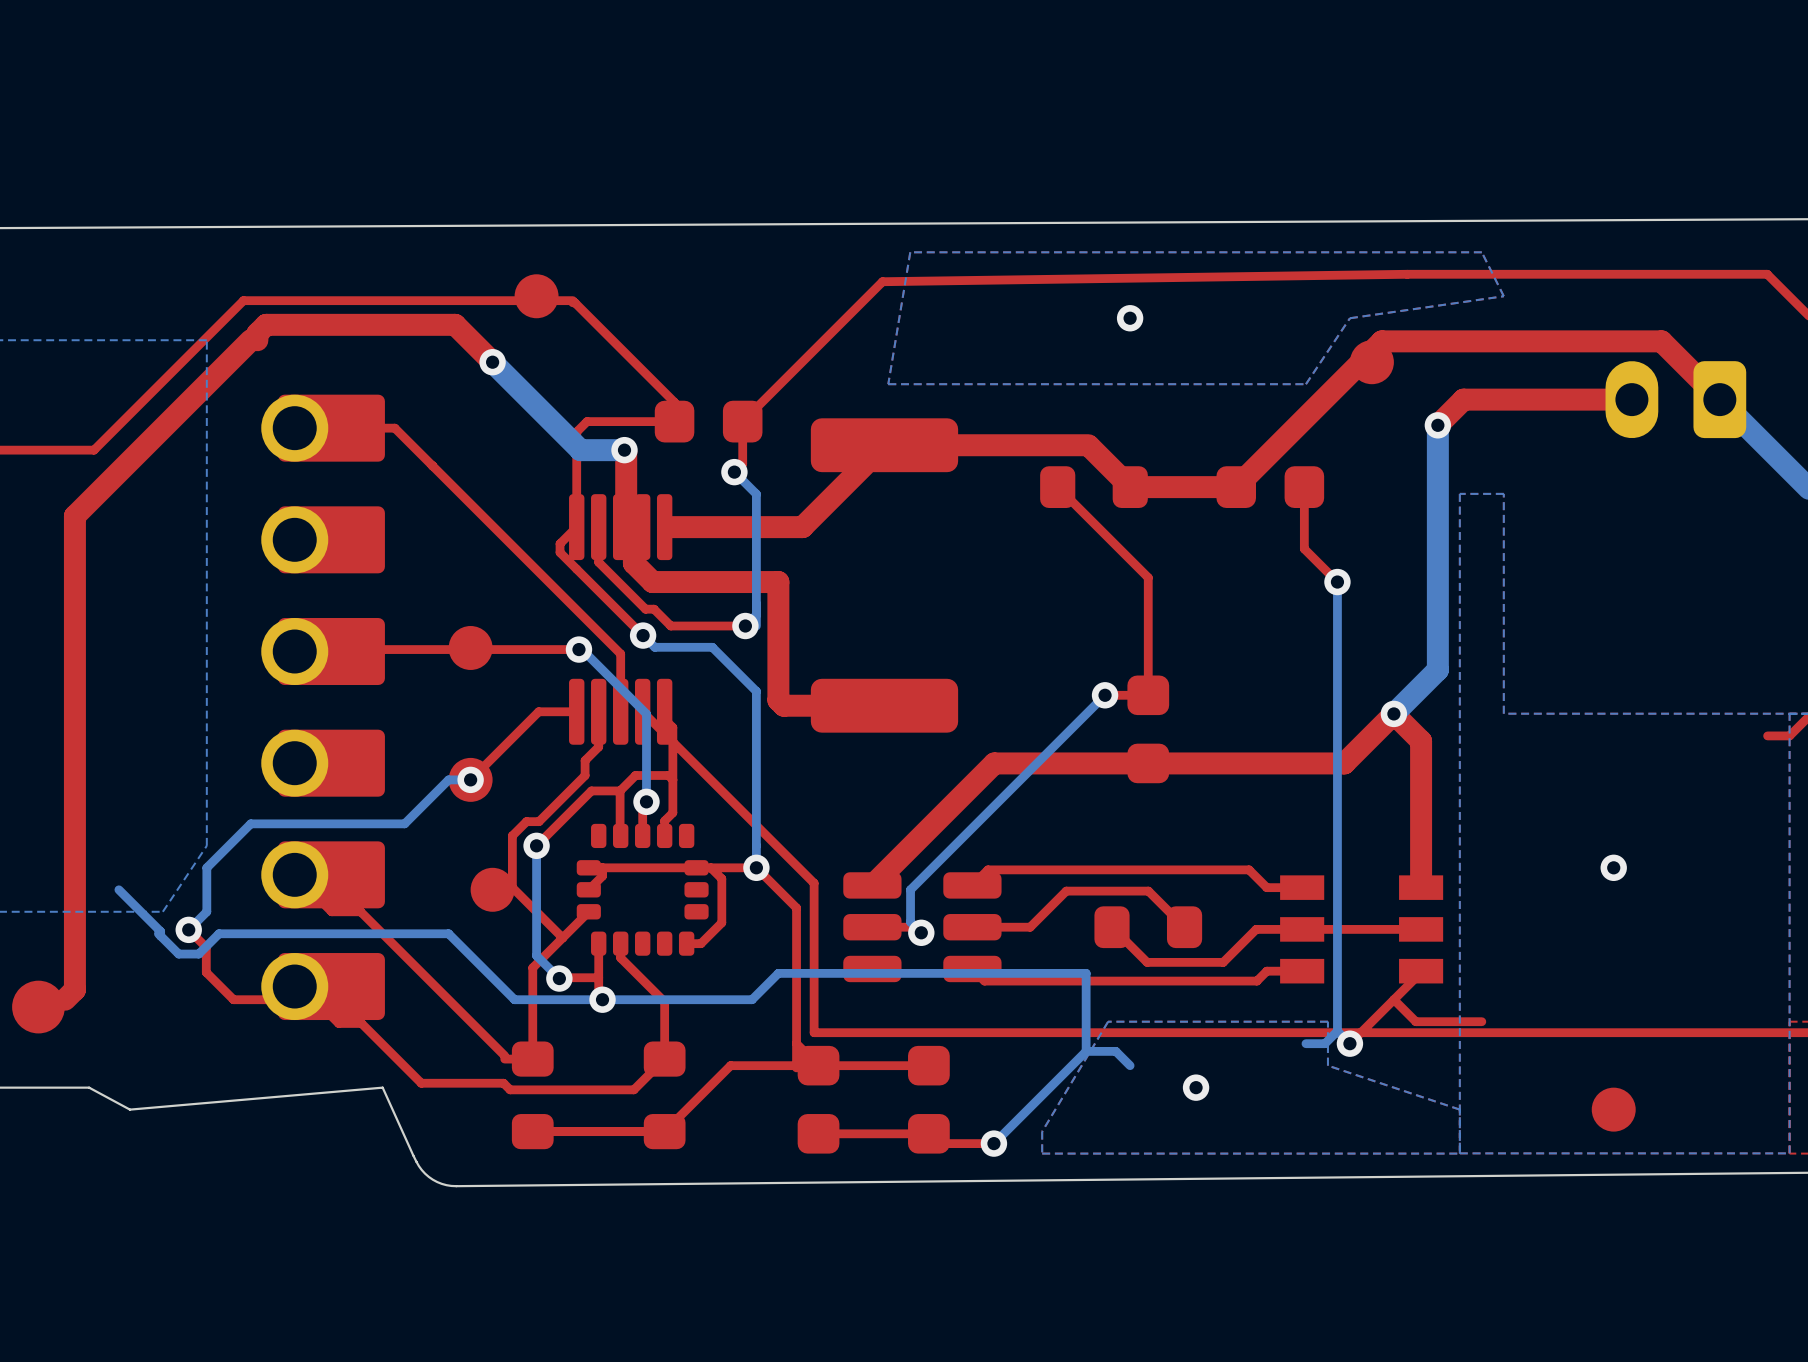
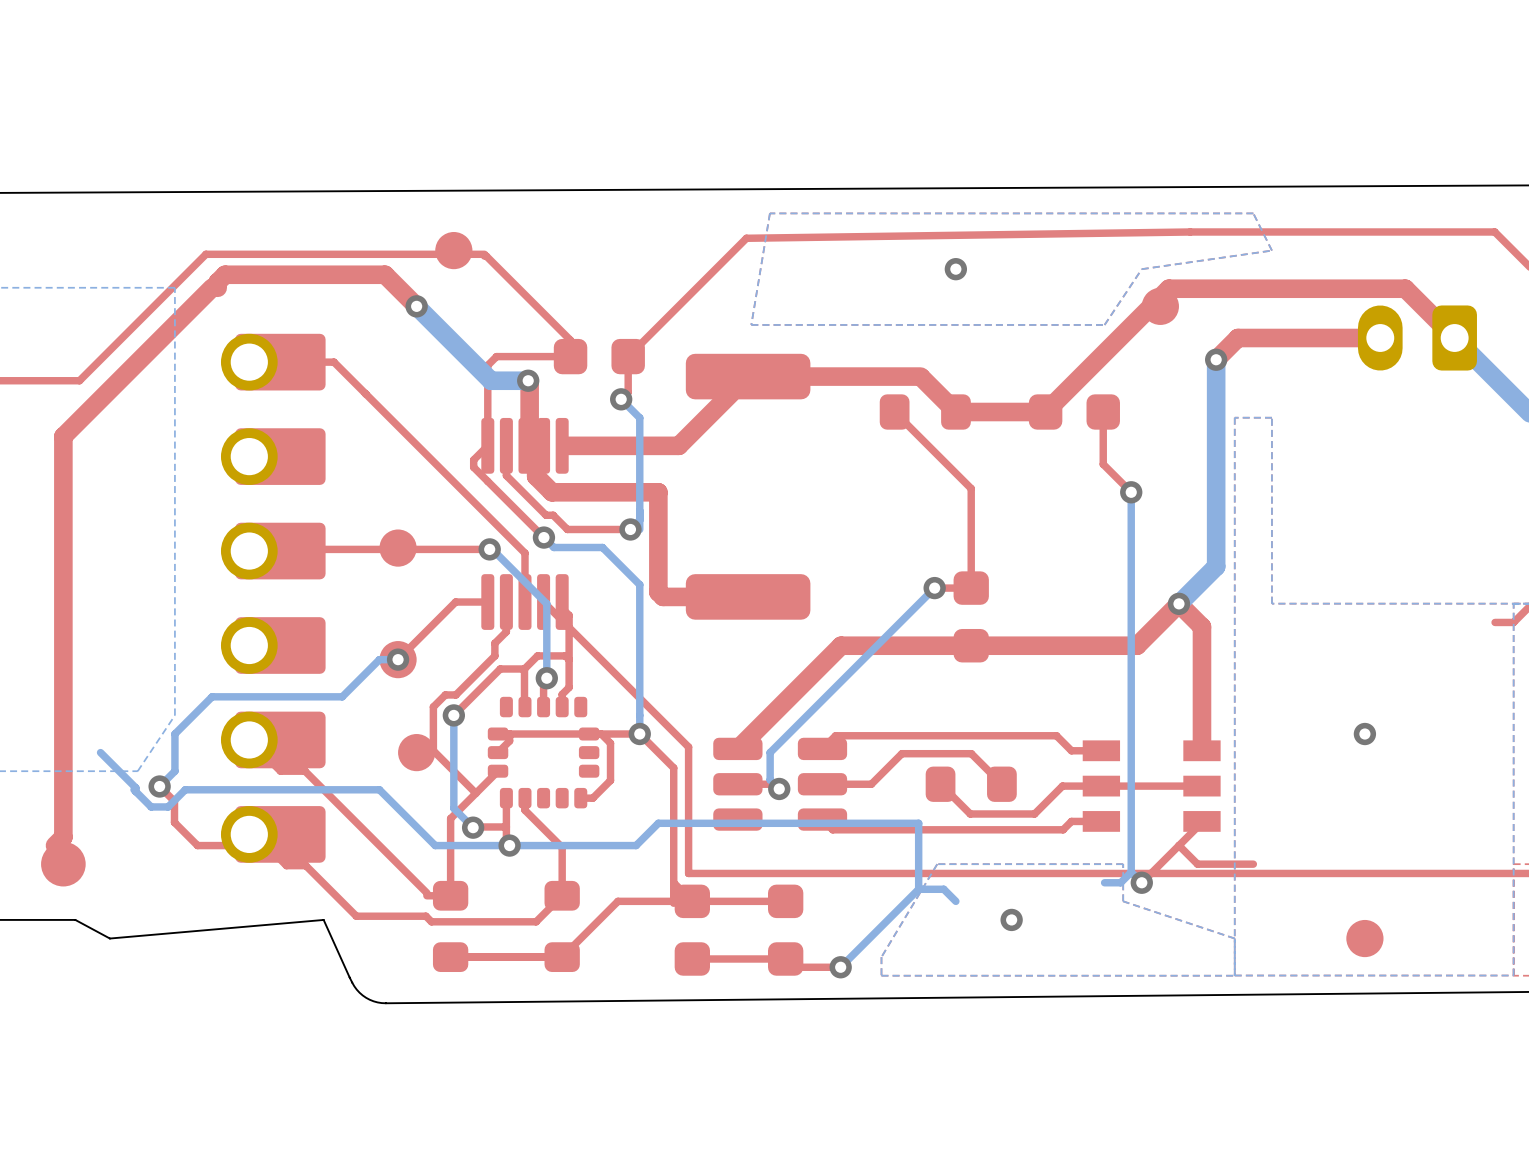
part position: (38, 1007) -> (63, 864)

